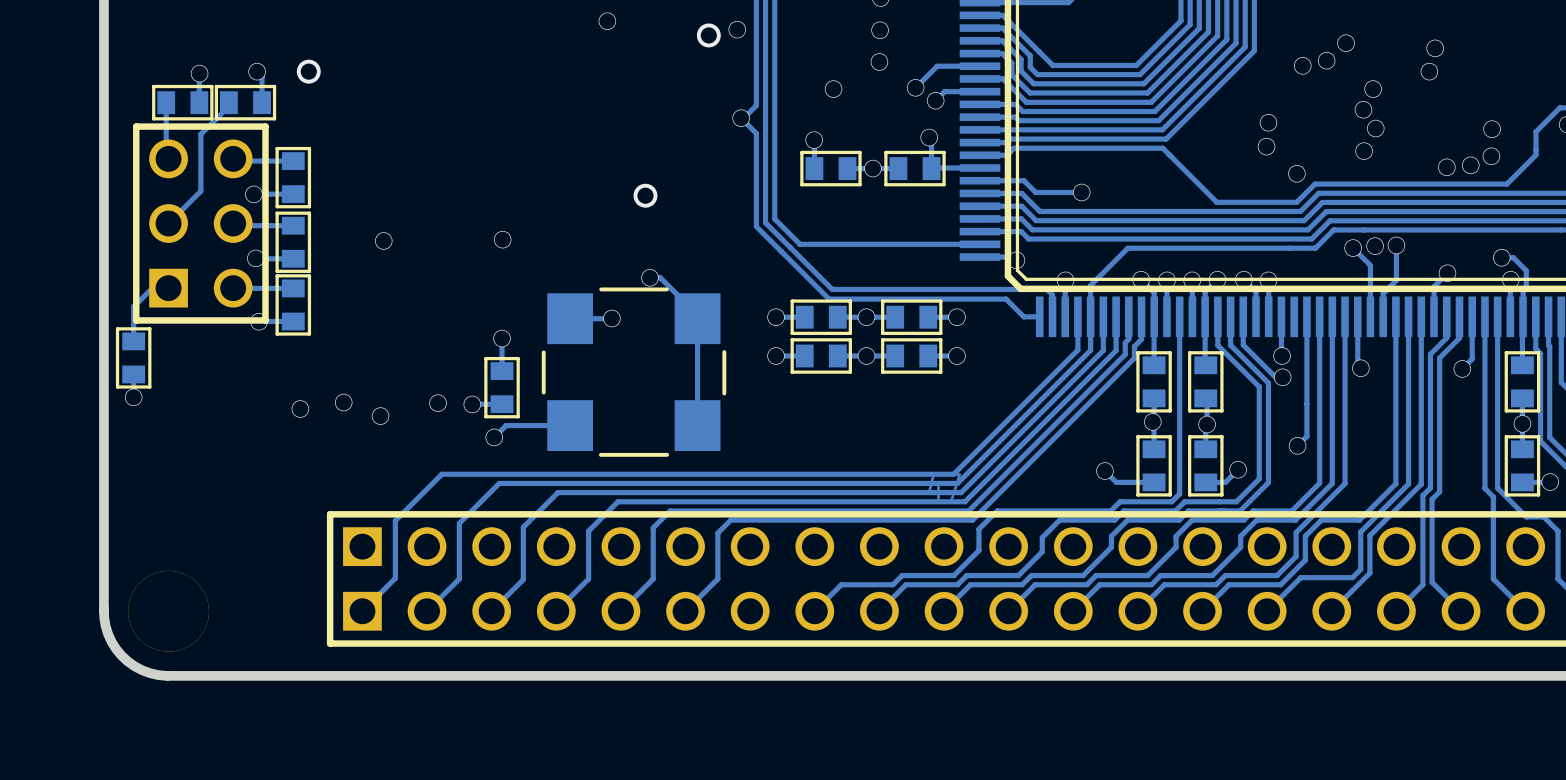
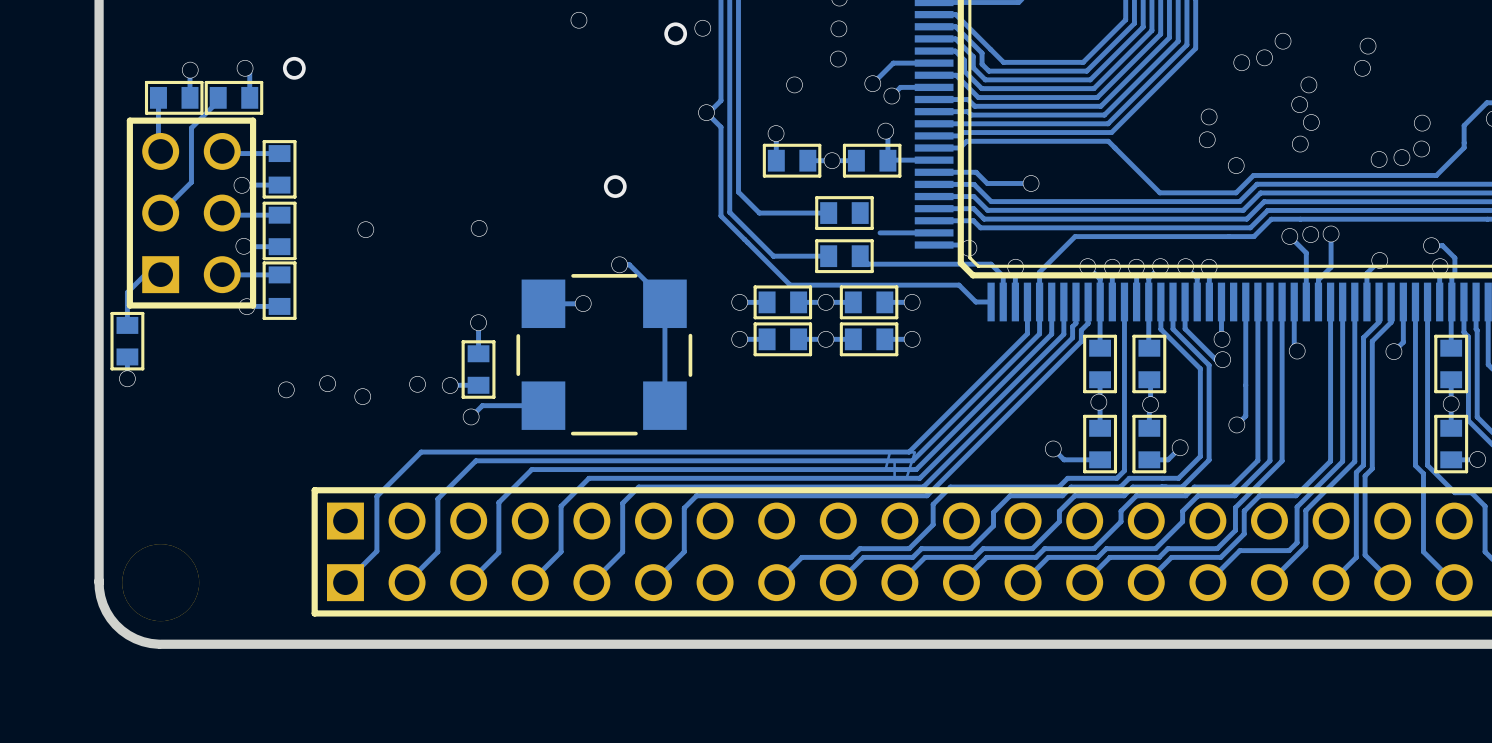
track: (774, 201) (774, 218) (800, 244) (923, 244) -> (738, 192) (759, 213) (828, 213)
part: none -> (844, 213)
track: (811, 268) (832, 289) (1046, 289) (1052, 295) -> (860, 256) (868, 264) (991, 264) (1003, 276) (1003, 281)
track: none -> (828, 256) (773, 256)
part: none -> (844, 256)

